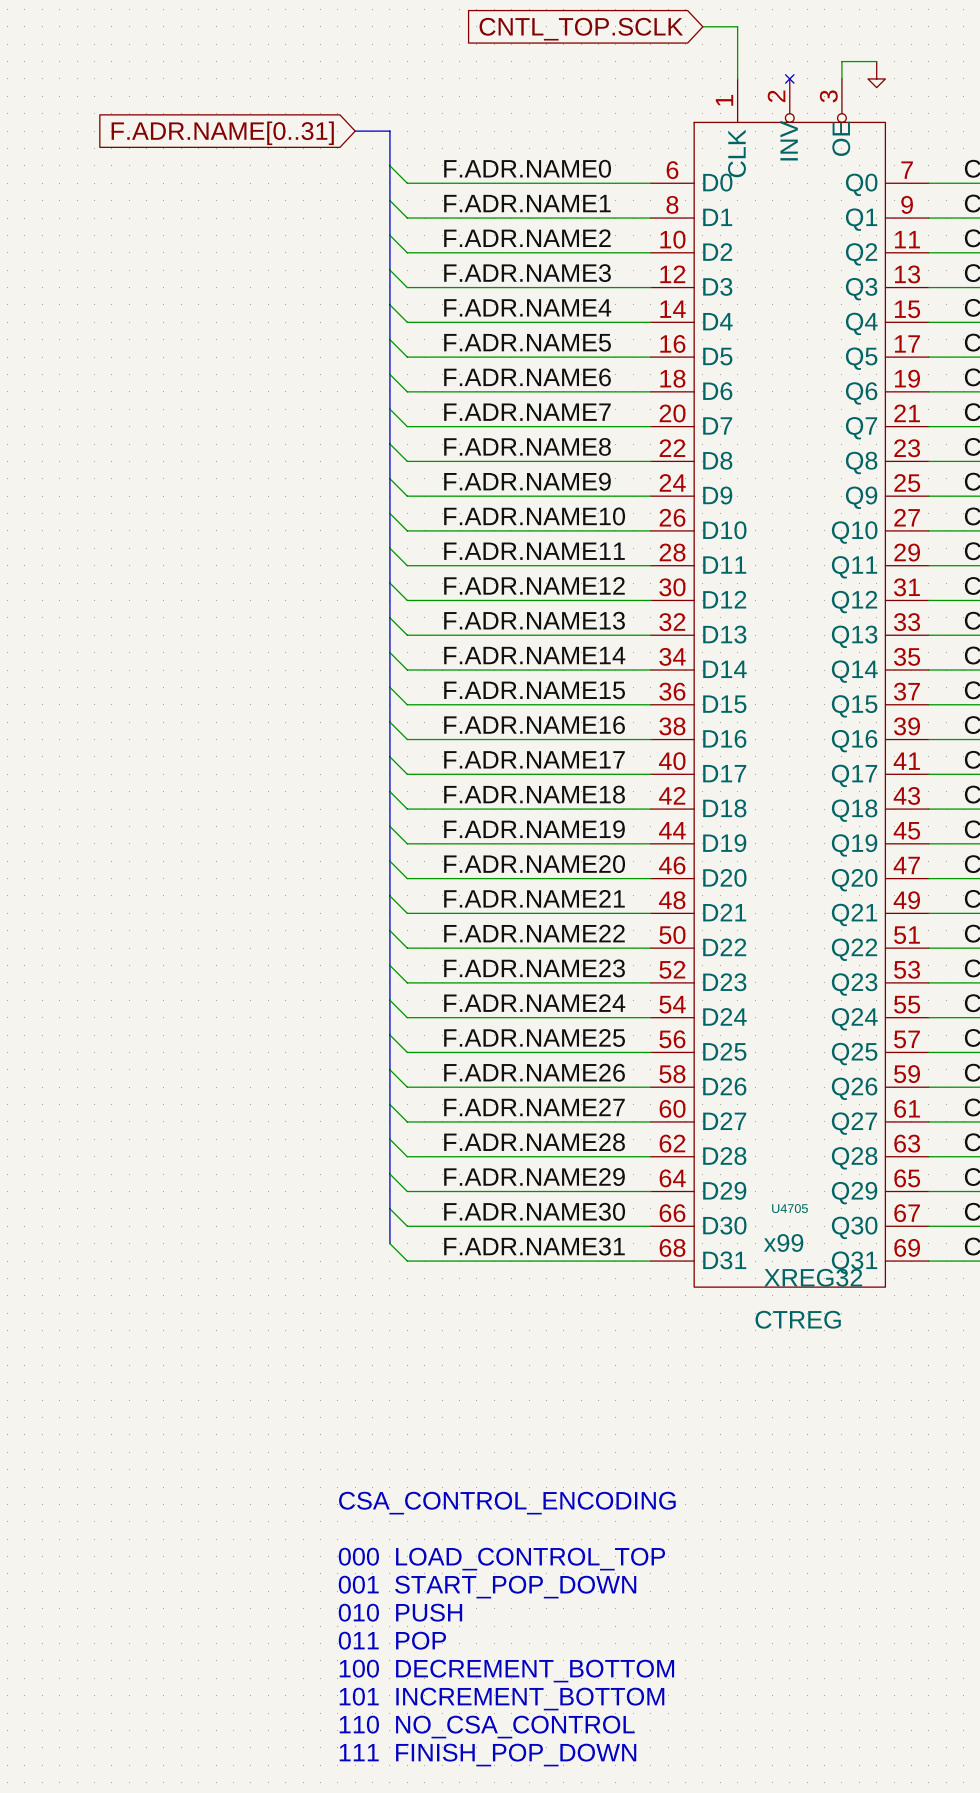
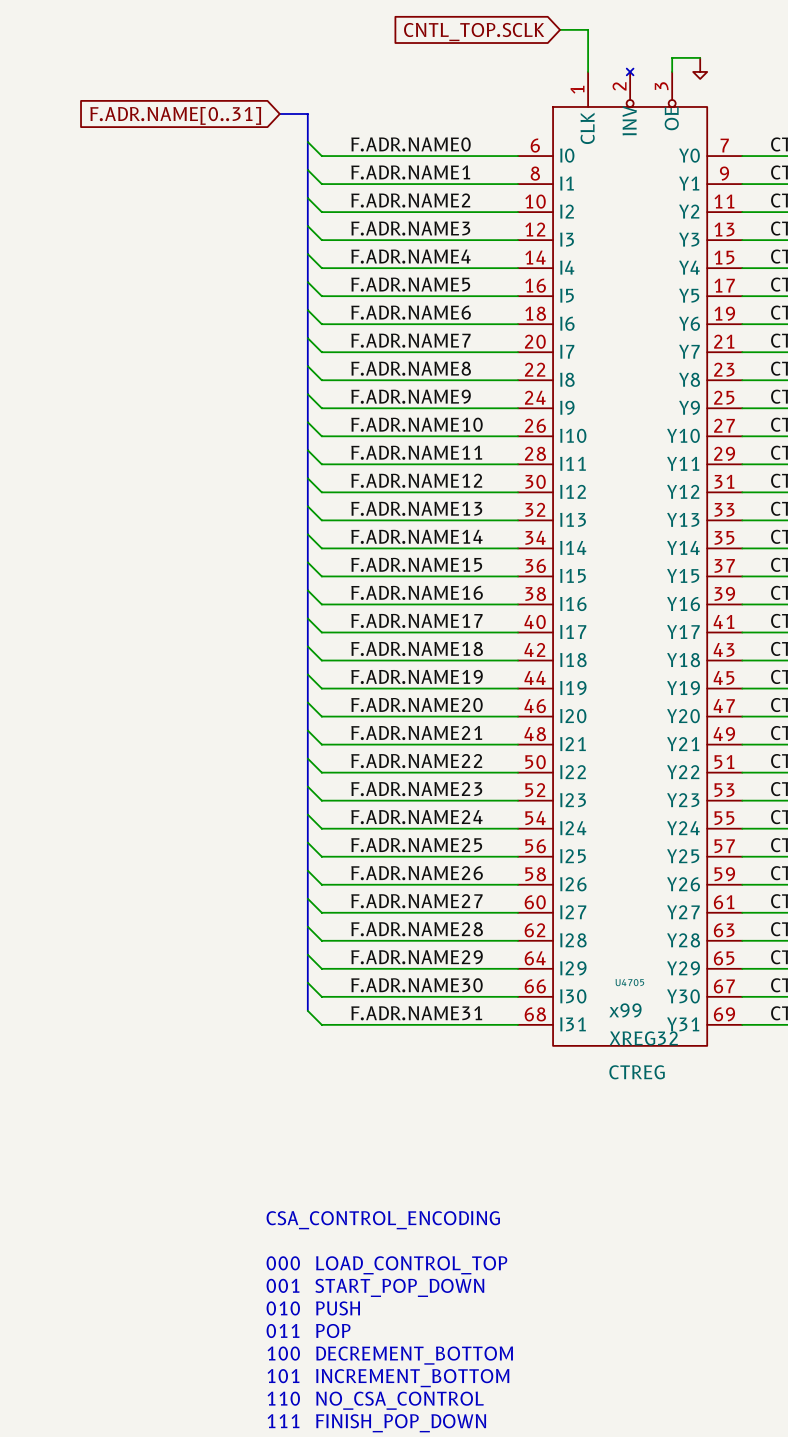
U4705 symbol: [650, 78, 929, 1288] -> [518, 71, 743, 1046]

